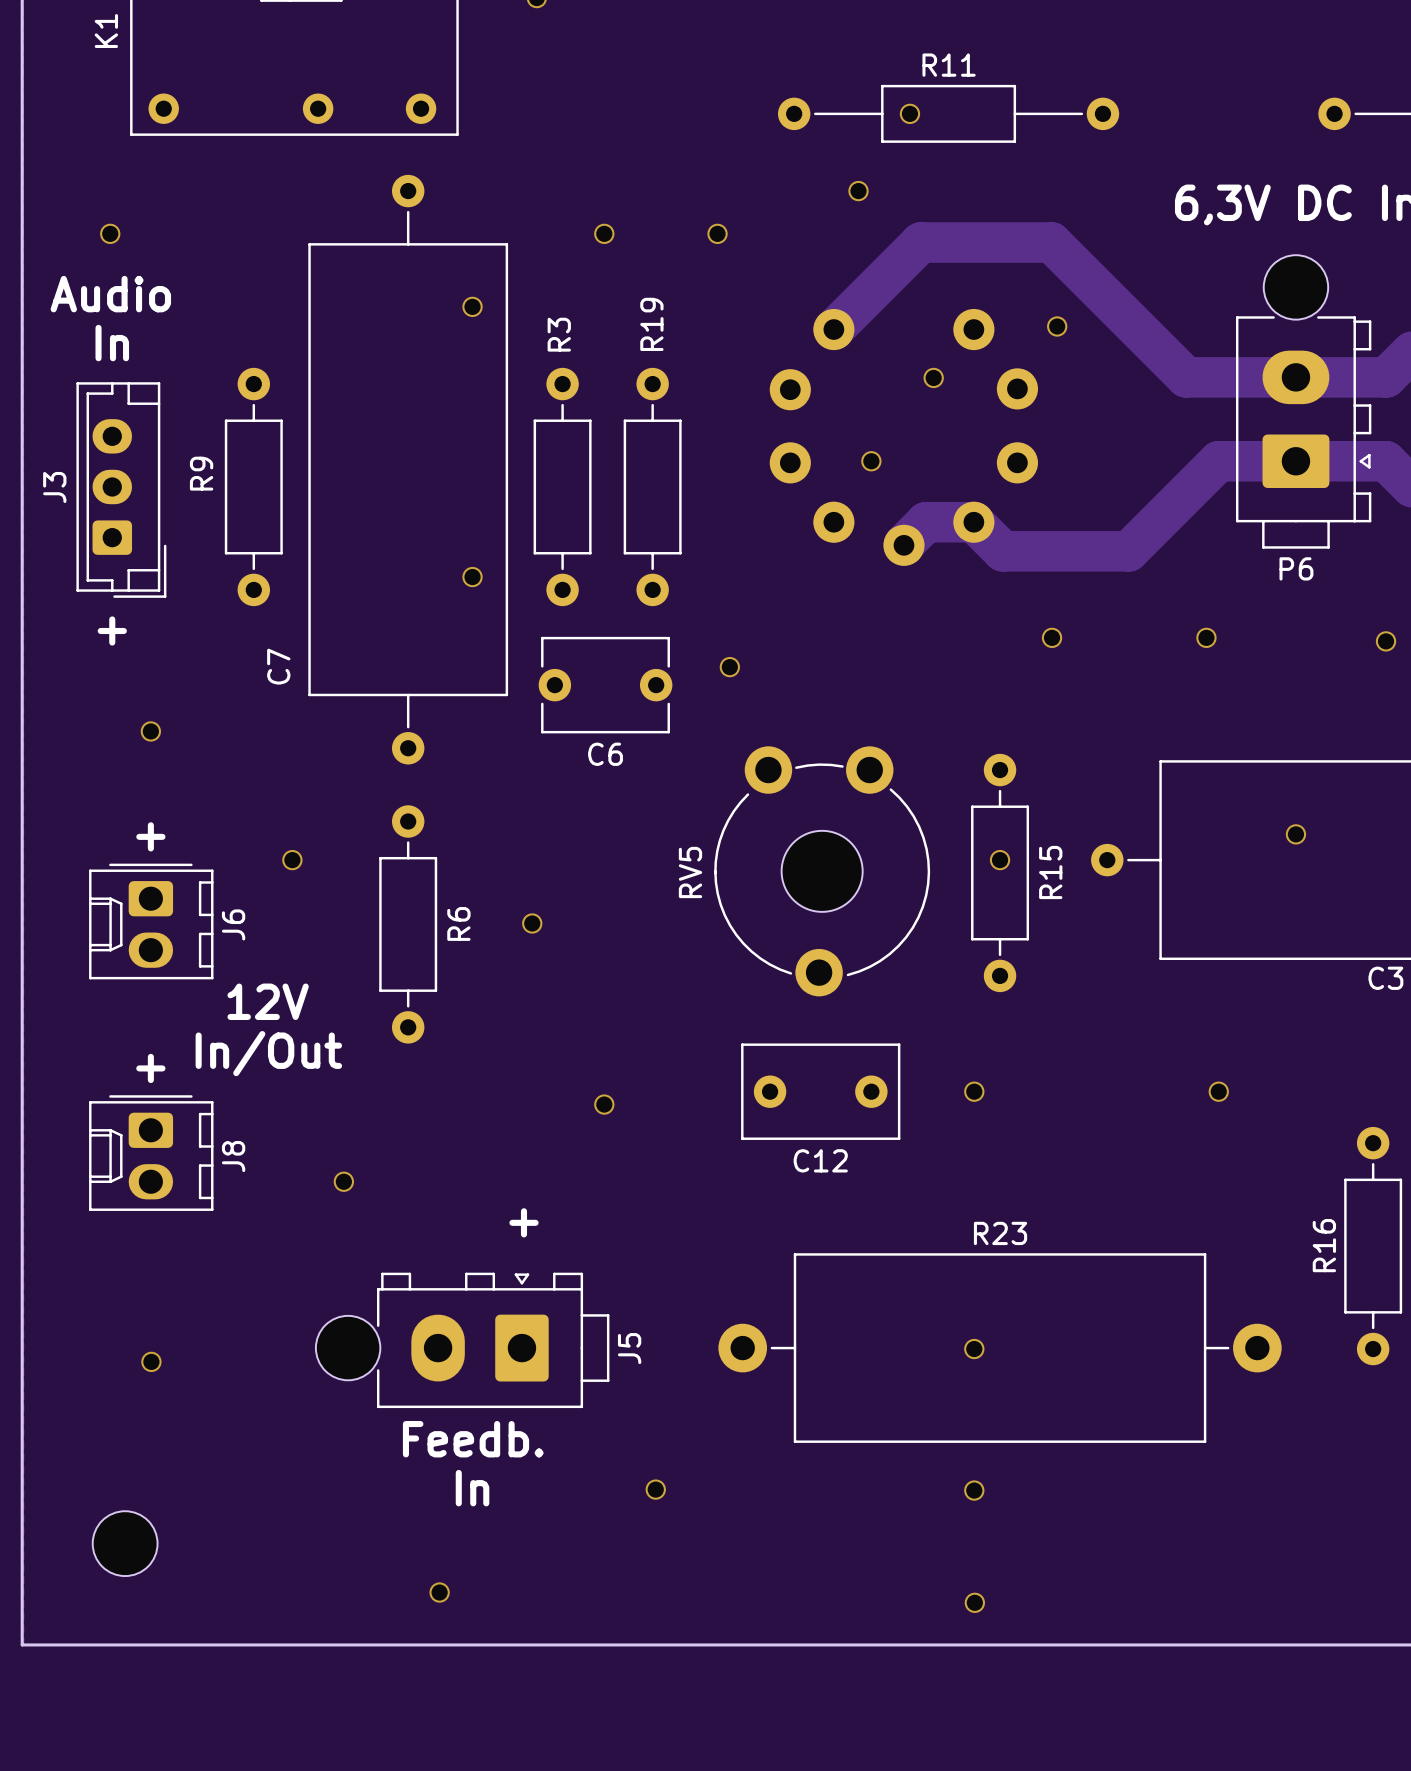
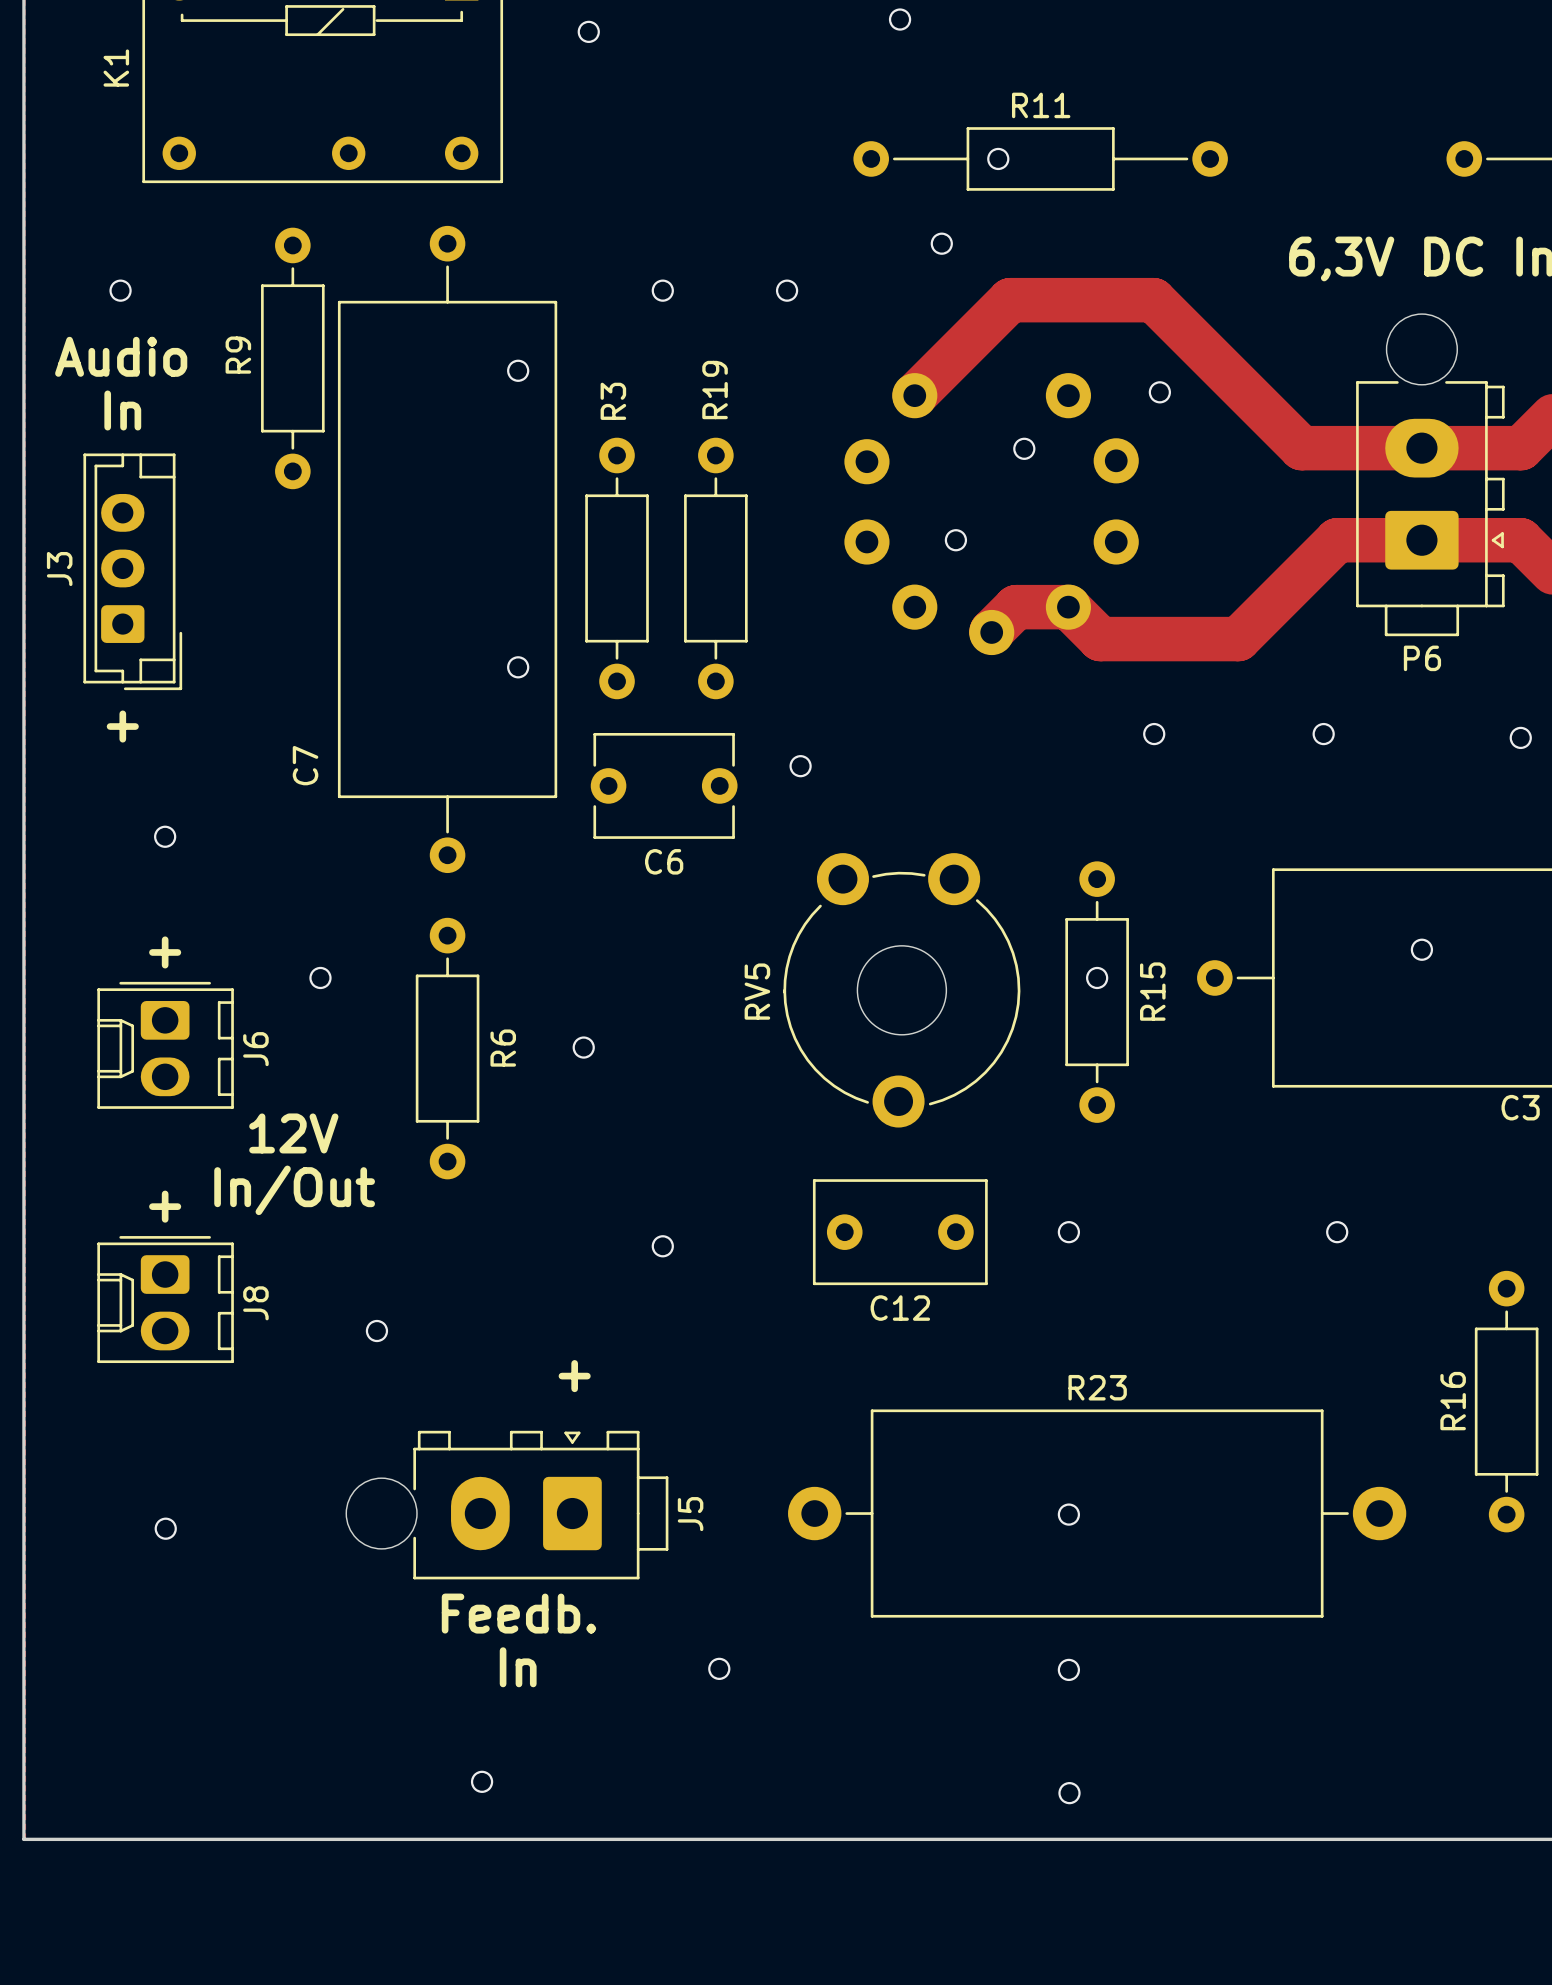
R9 name position: R9 (201, 473) -> R9 (238, 355)
R9 position: (253, 486) -> (292, 358)
part: (125, 1543) -> none

